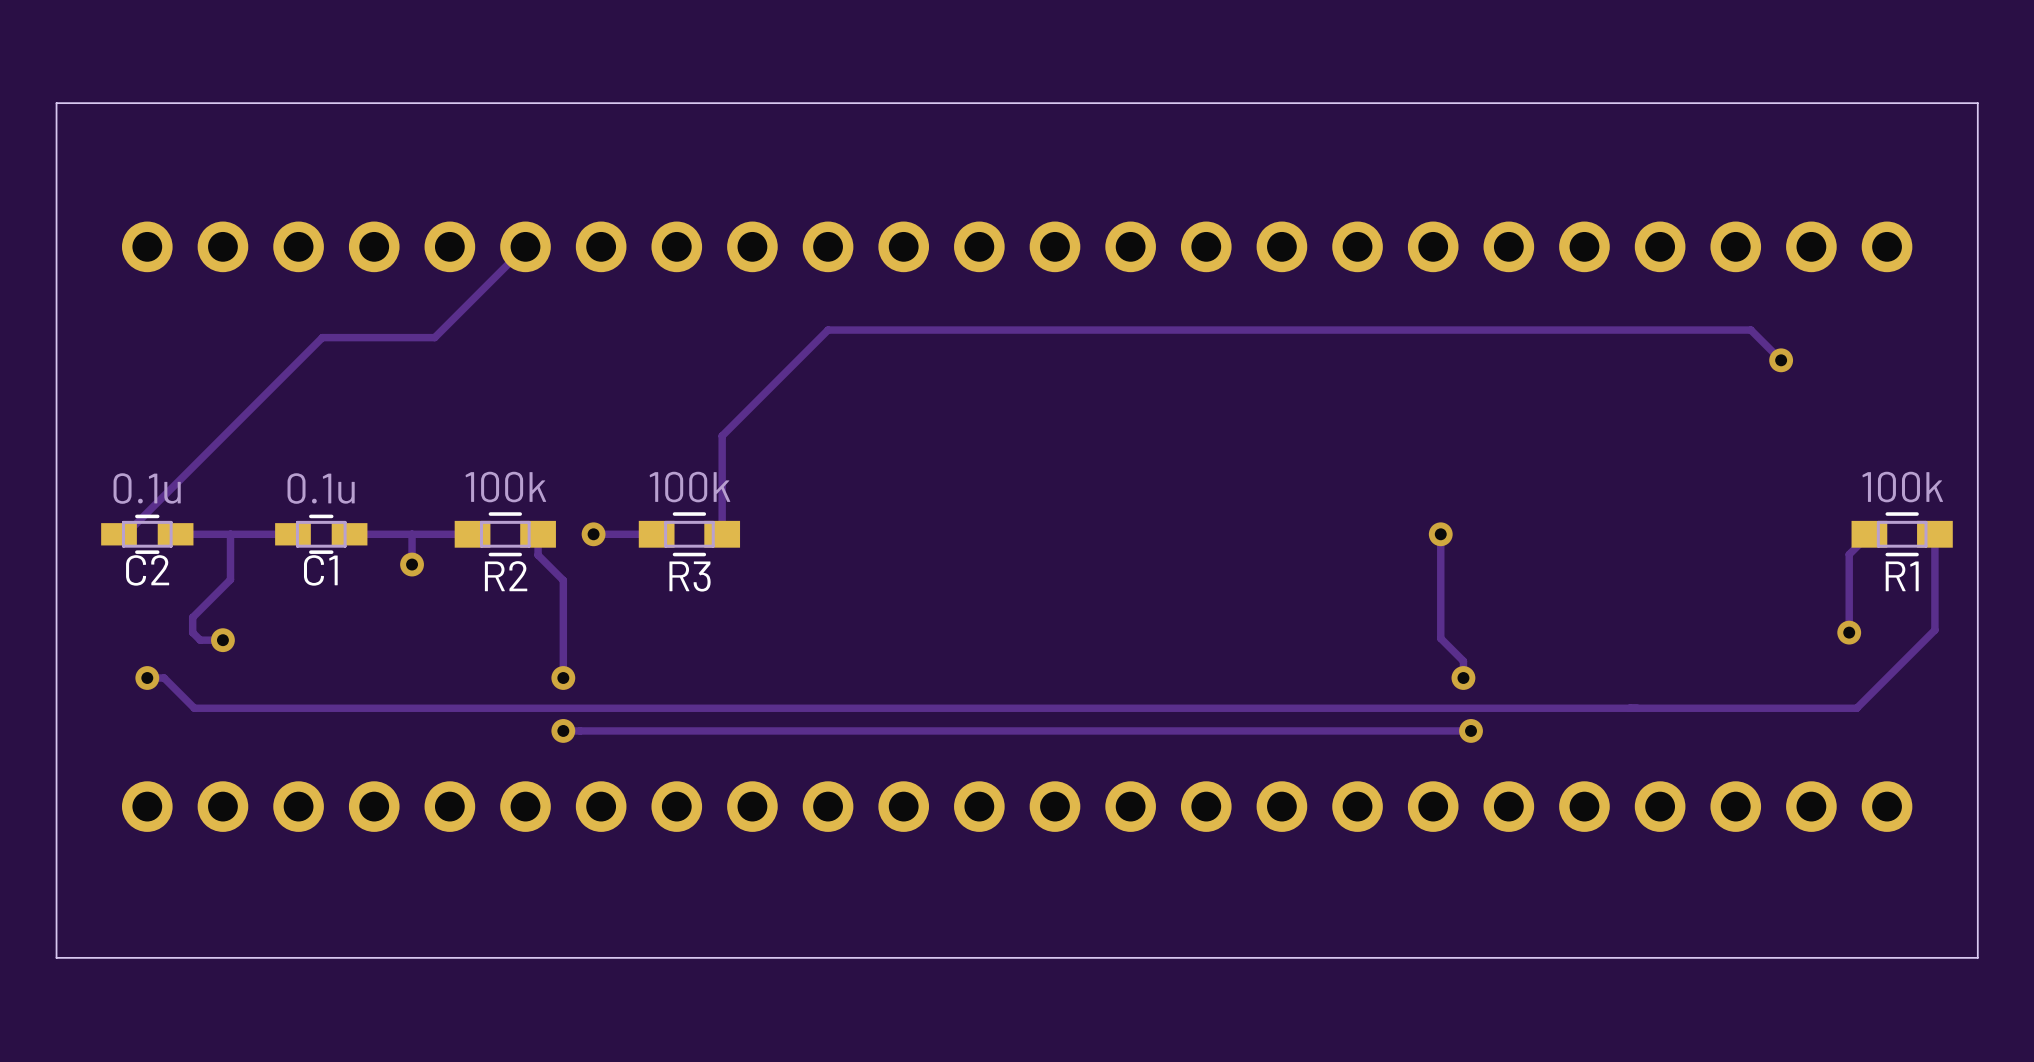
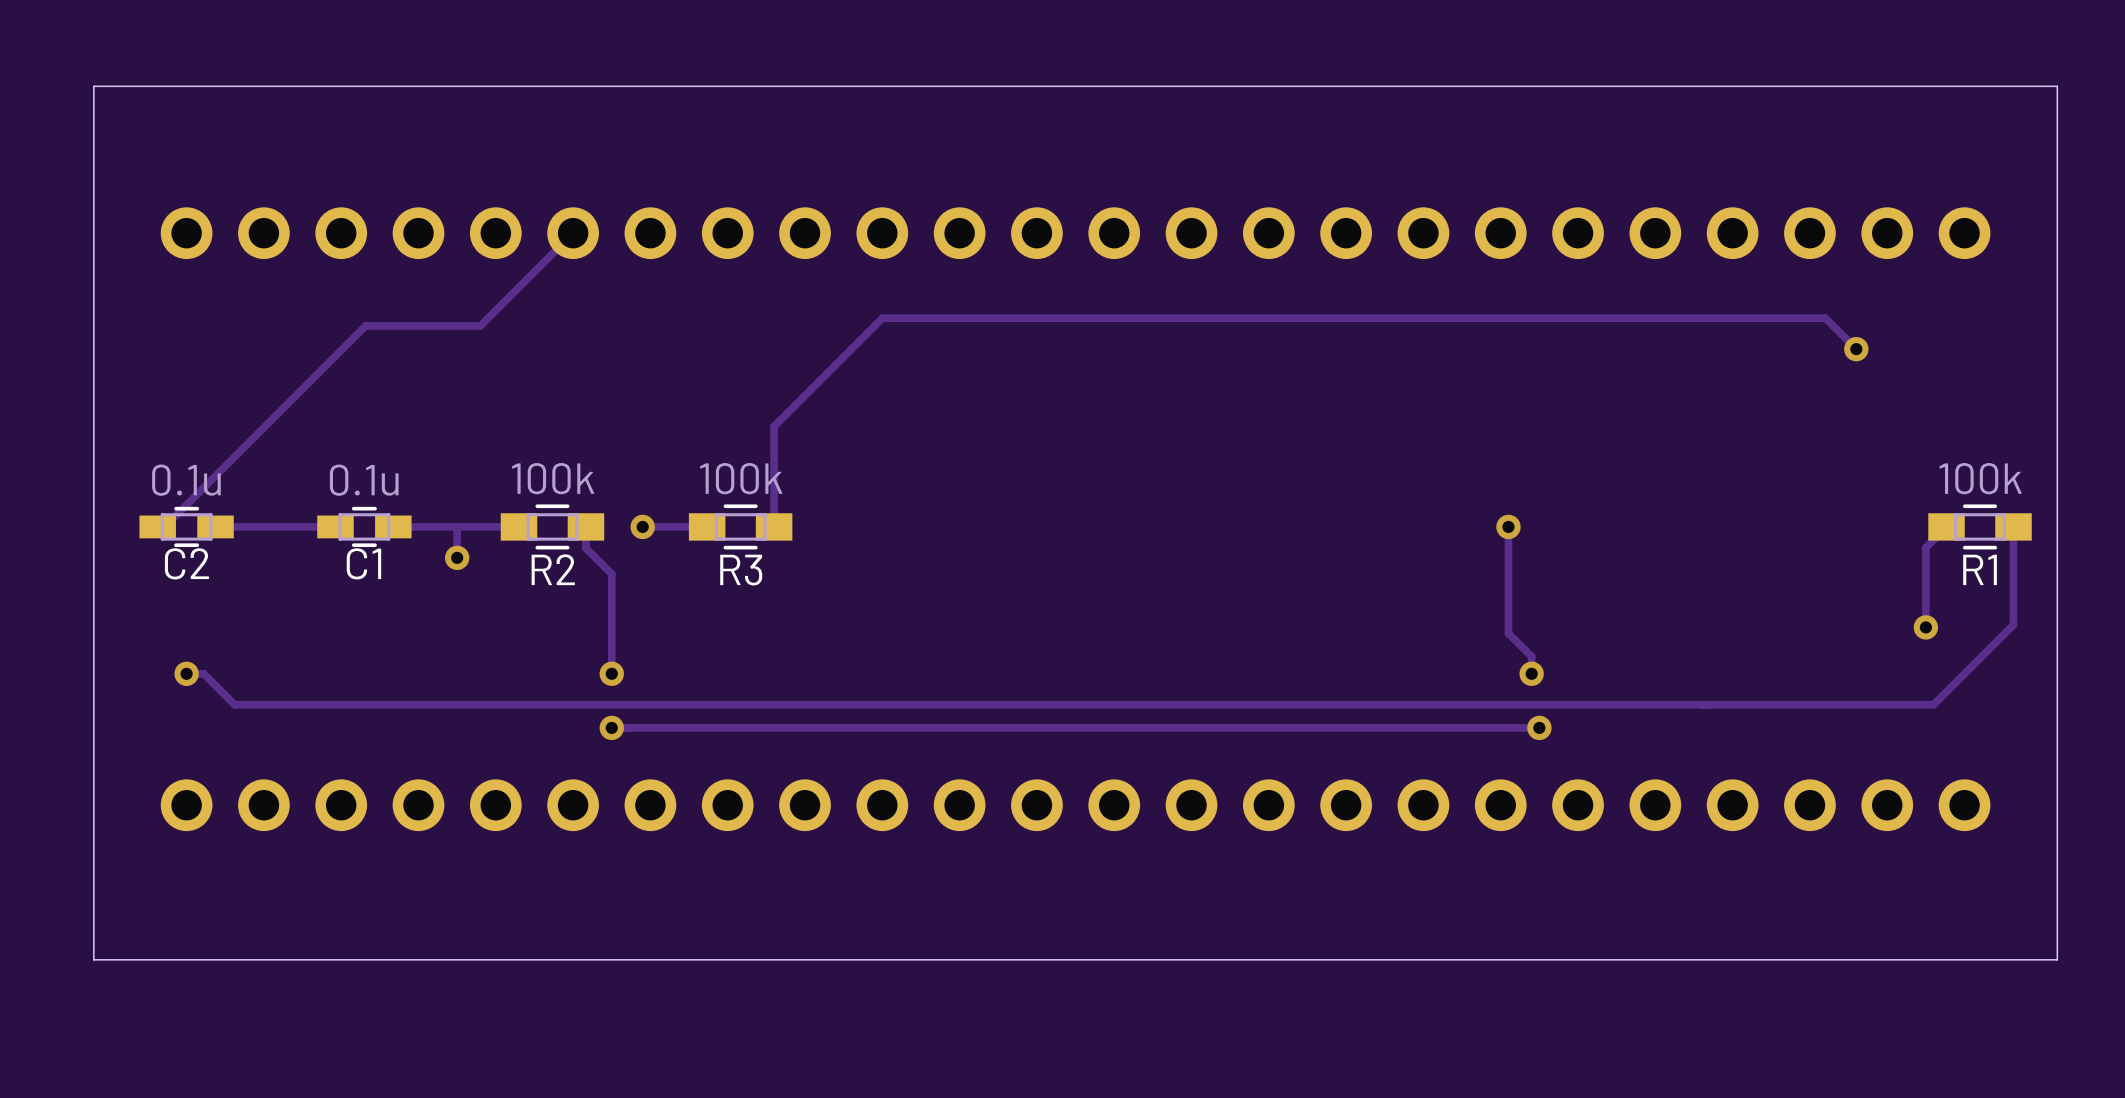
track: (230, 534) (230, 579) (192, 617) (192, 632) (200, 640) (222, 640) -> none
via: (222, 640) -> none

